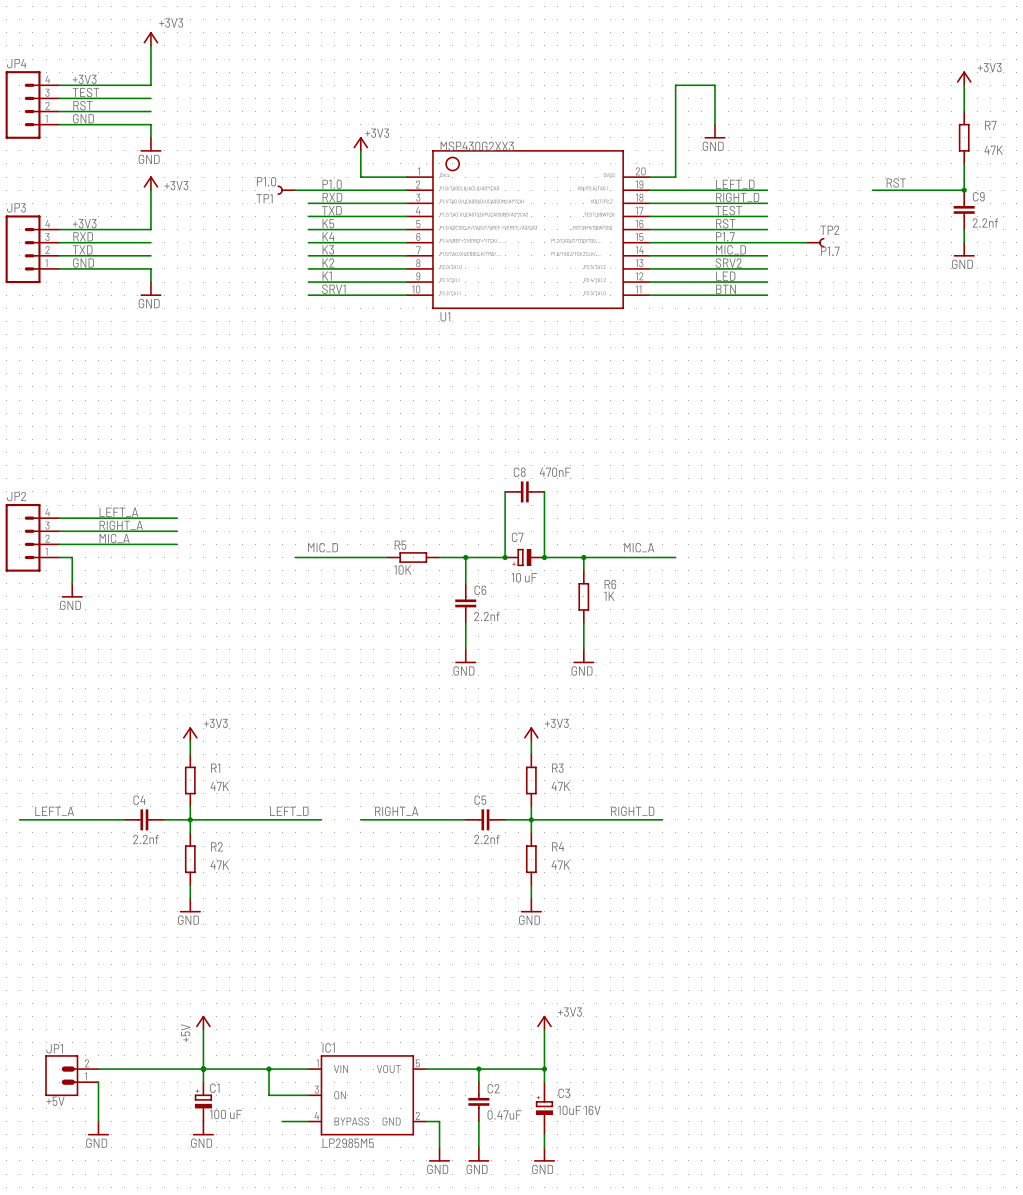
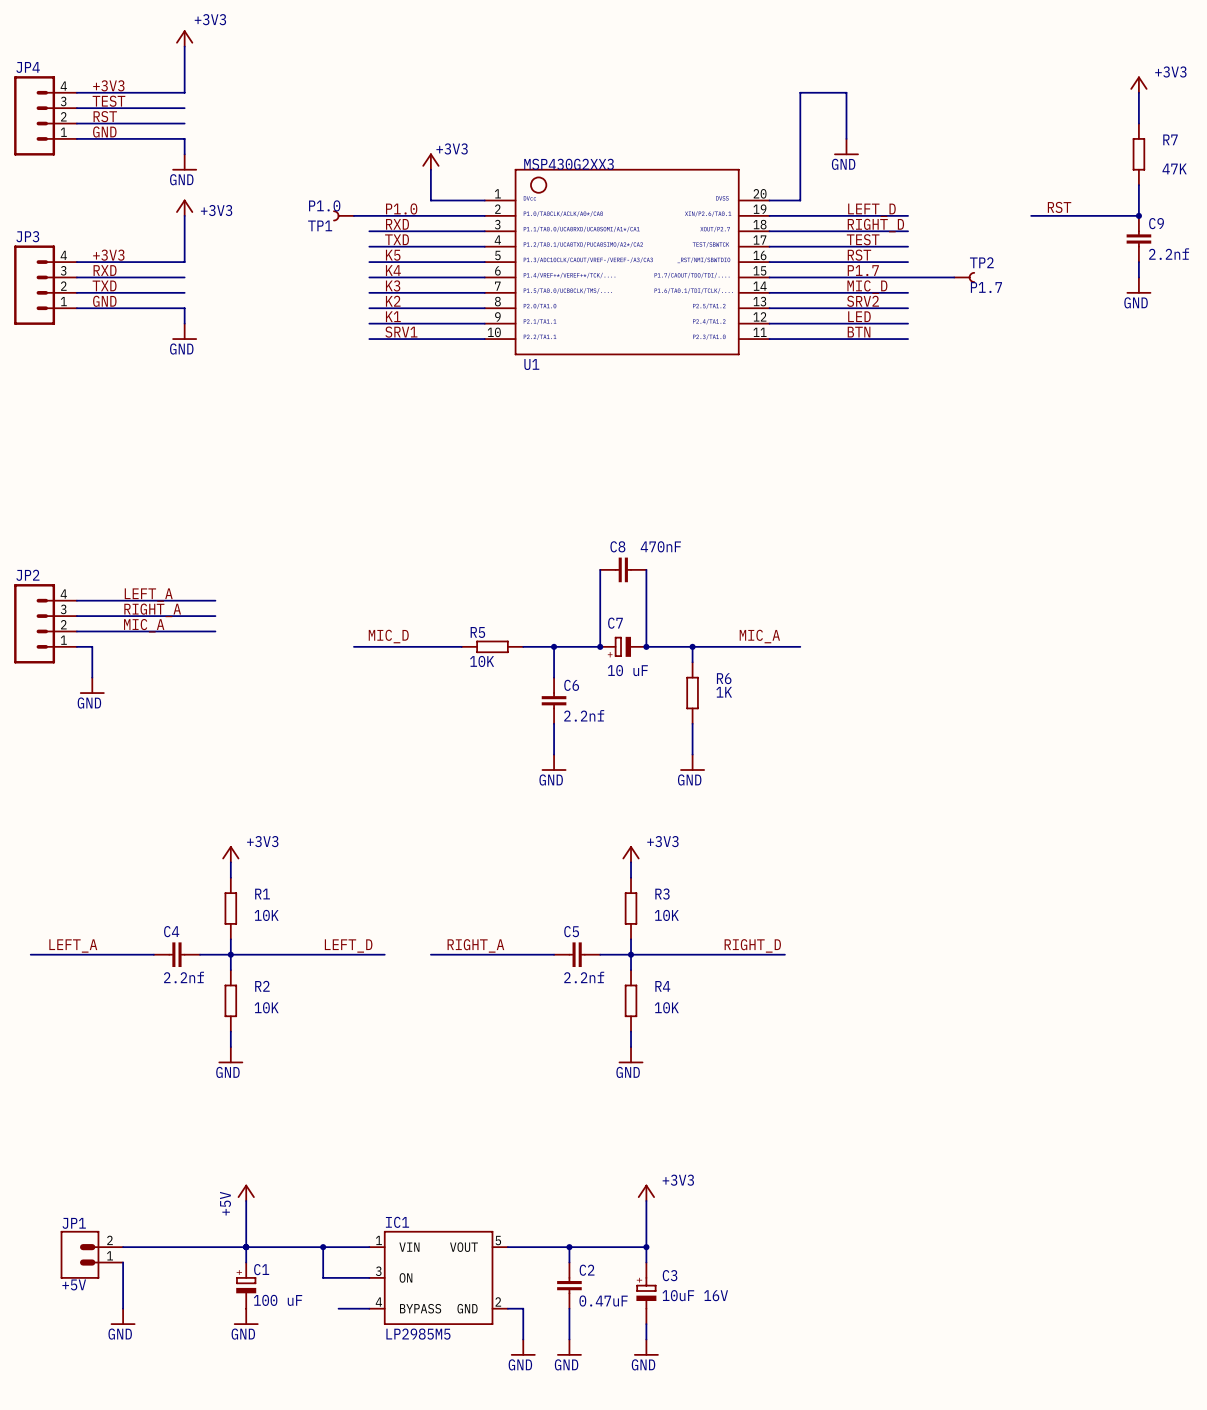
R1 value: 47K (219, 786) -> 10K (266, 915)
R3 value: 47K (560, 786) -> 10K (666, 915)
R2 value: 47K (219, 865) -> 10K (266, 1007)
R4 value: 47K (560, 865) -> 10K (666, 1007)

